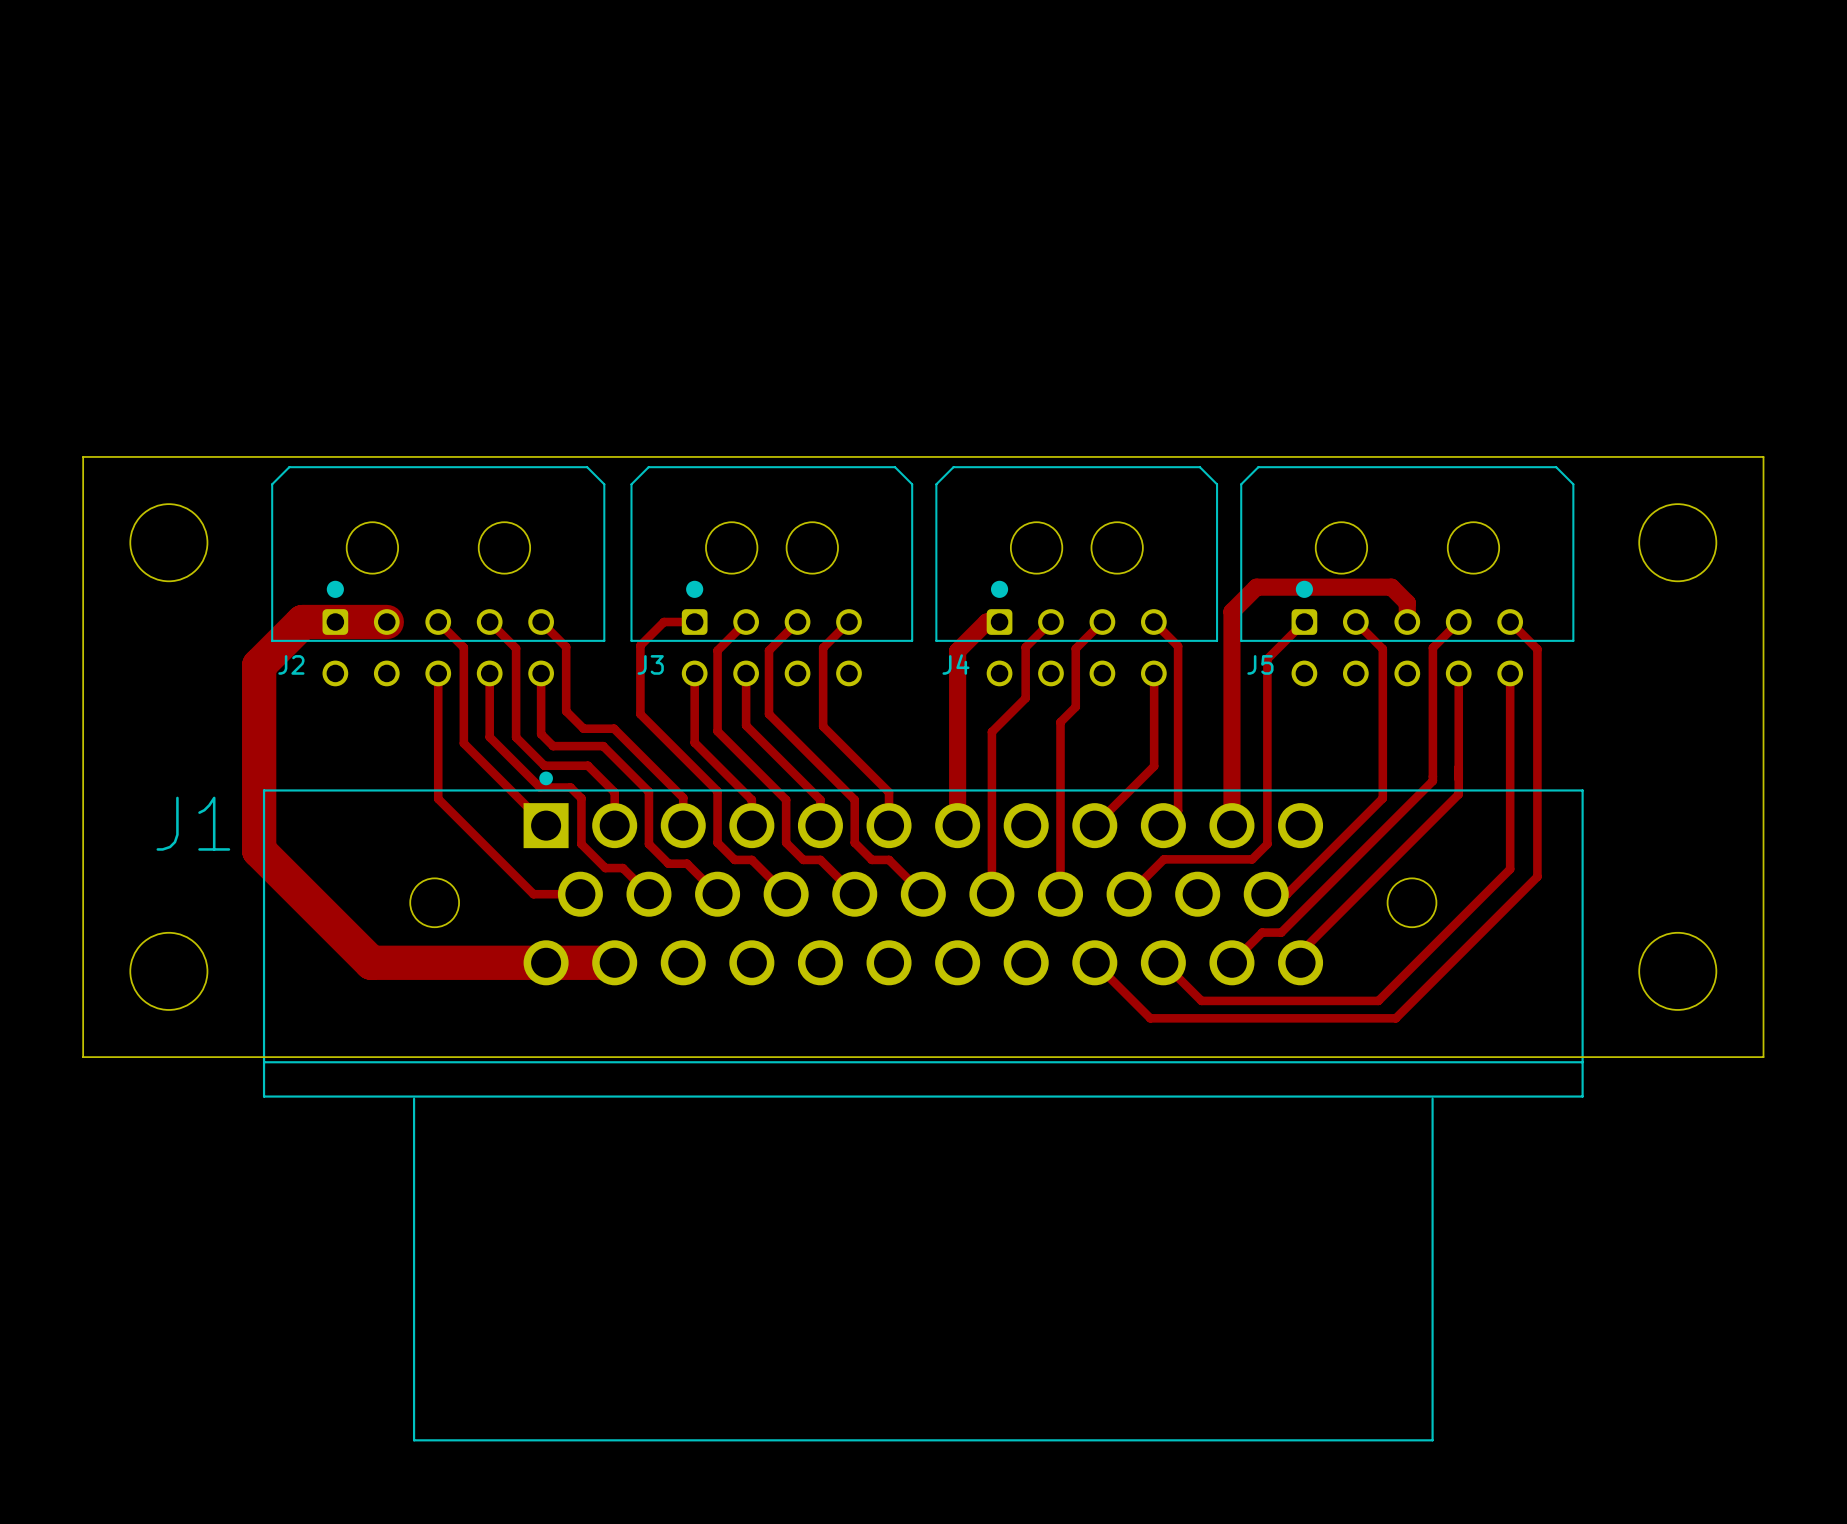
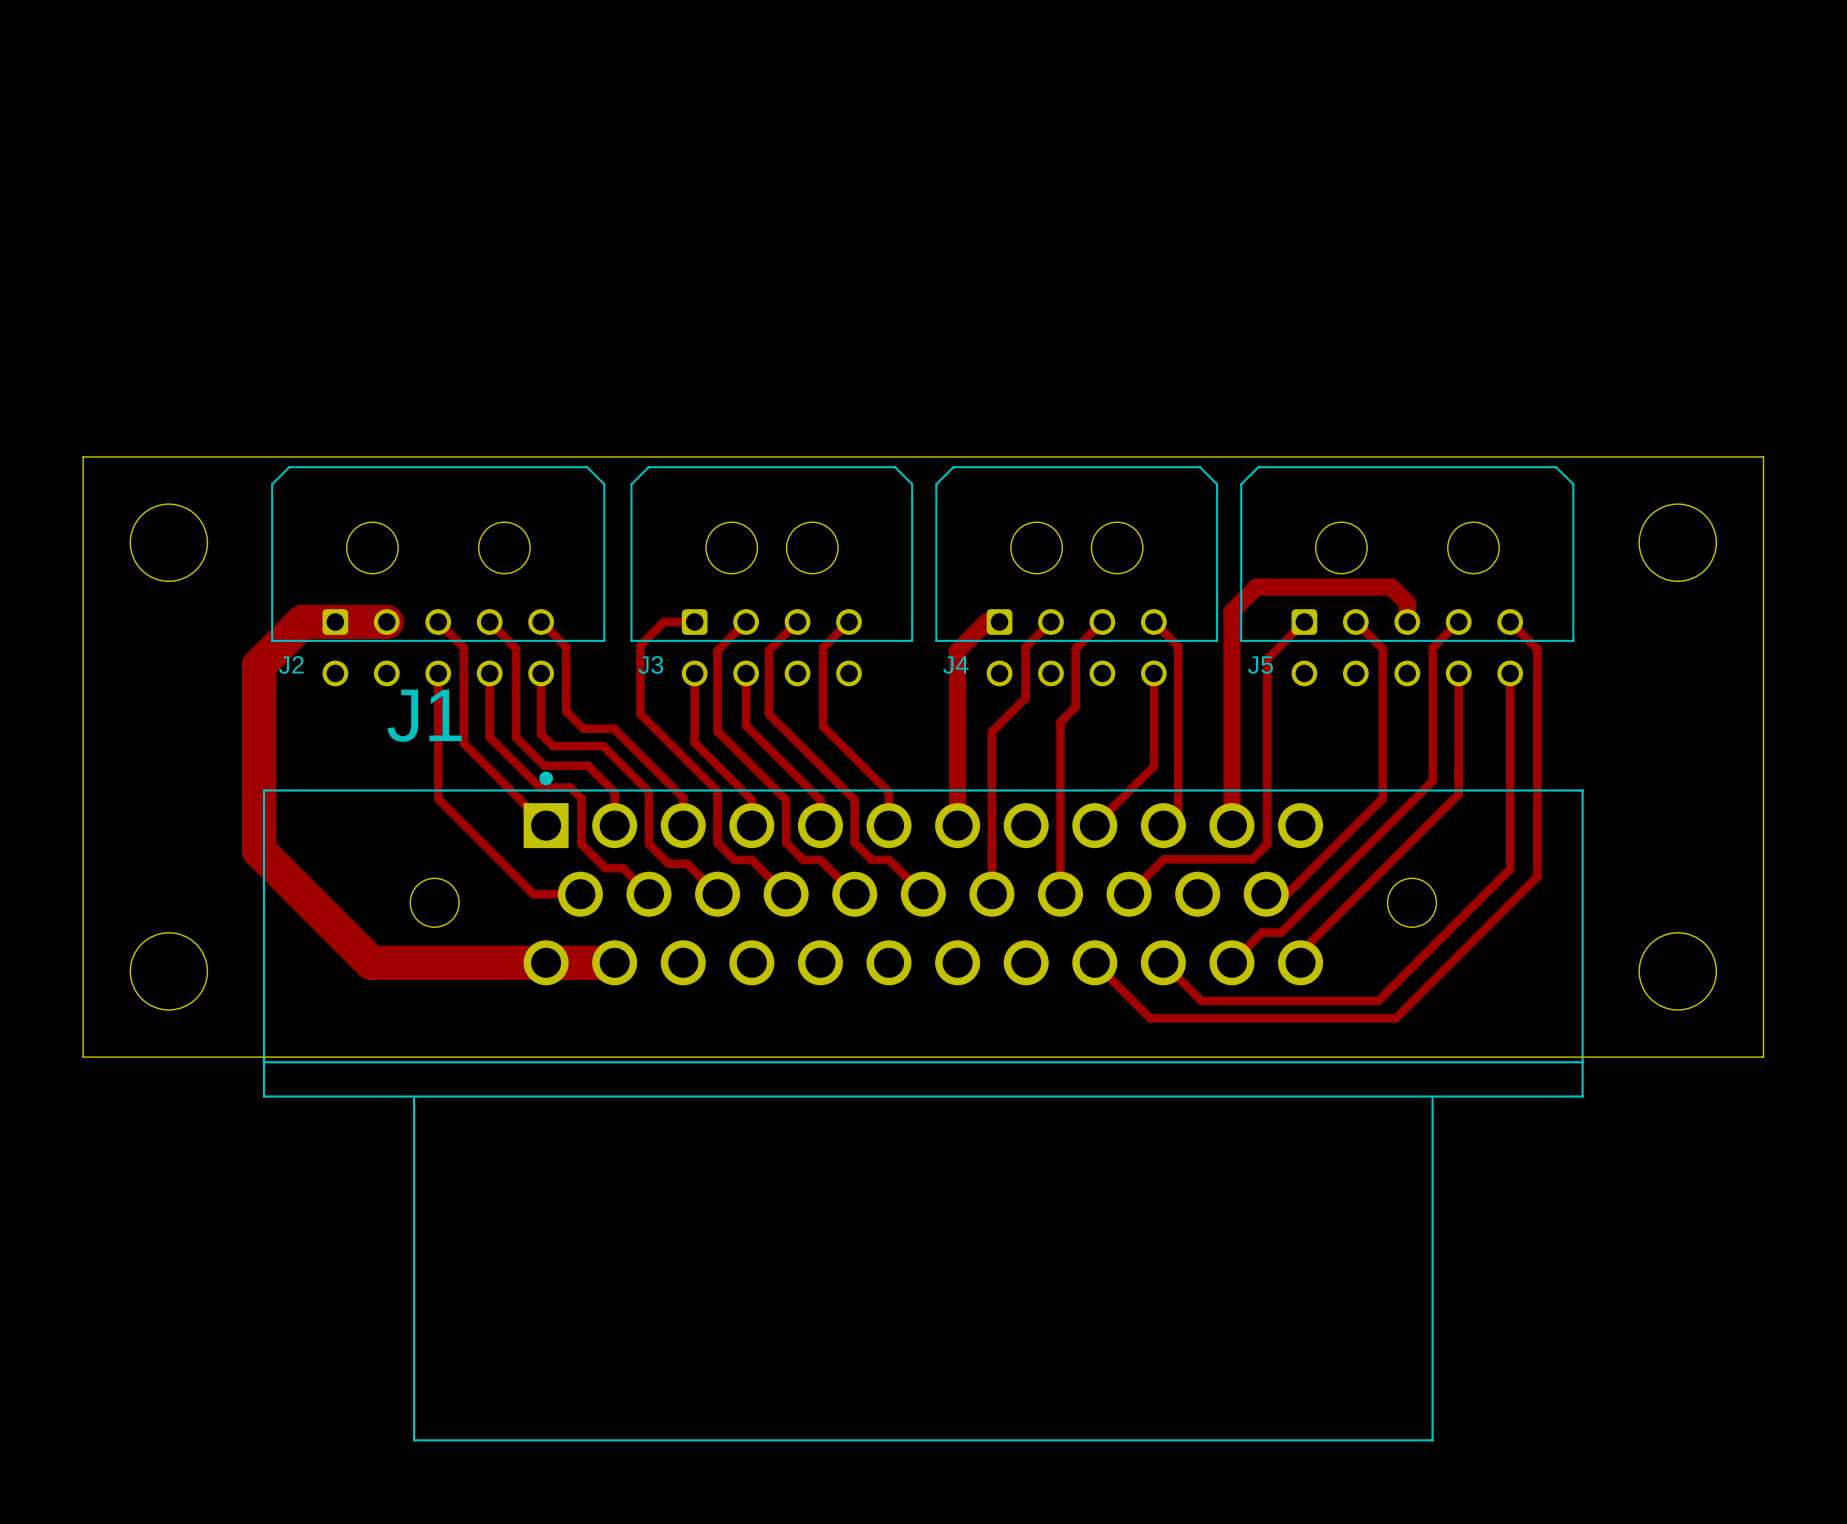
drawing: [326, 580, 344, 598] -> none
drawing: [686, 580, 704, 598] -> none
drawing: [990, 580, 1009, 598] -> none
drawing: [1295, 580, 1313, 598] -> none
J1 name position: J1 (193, 823) -> J1 (424, 715)

